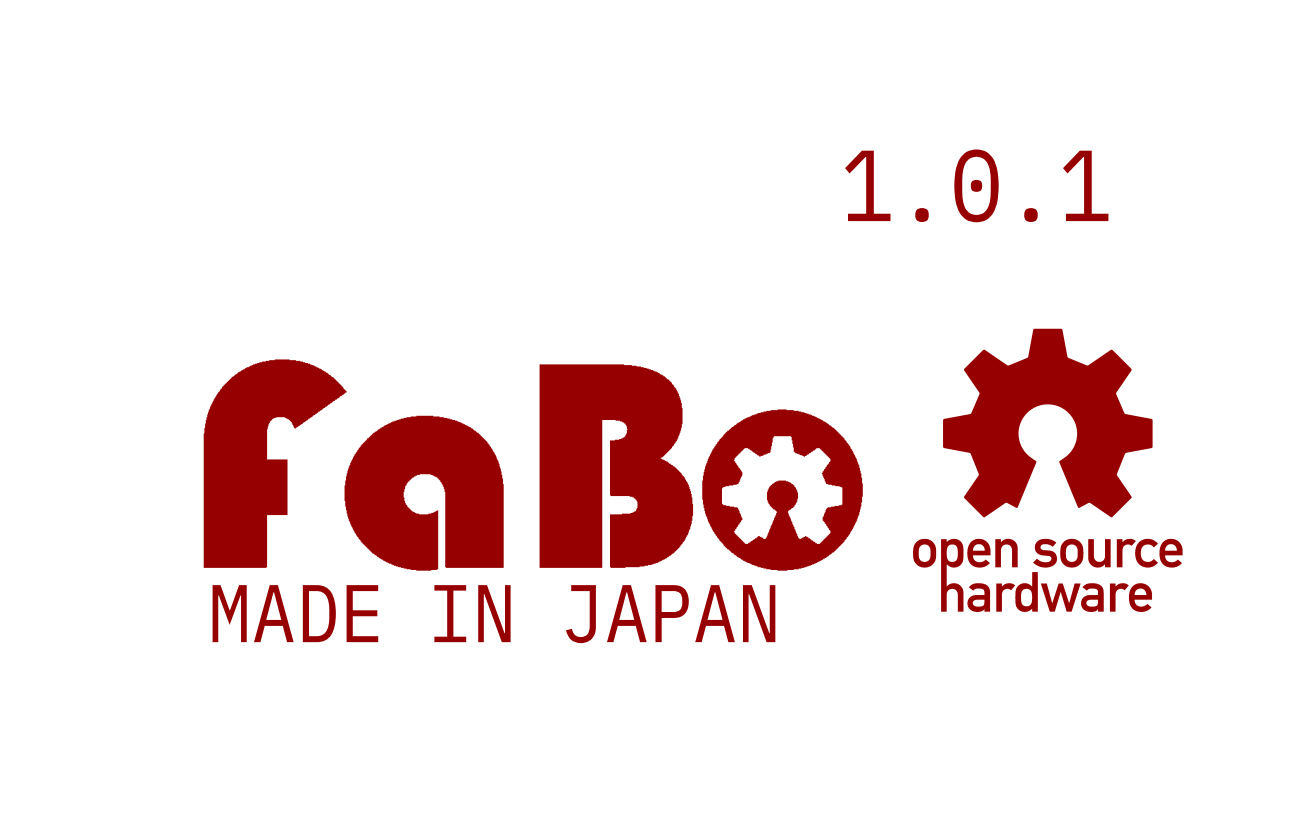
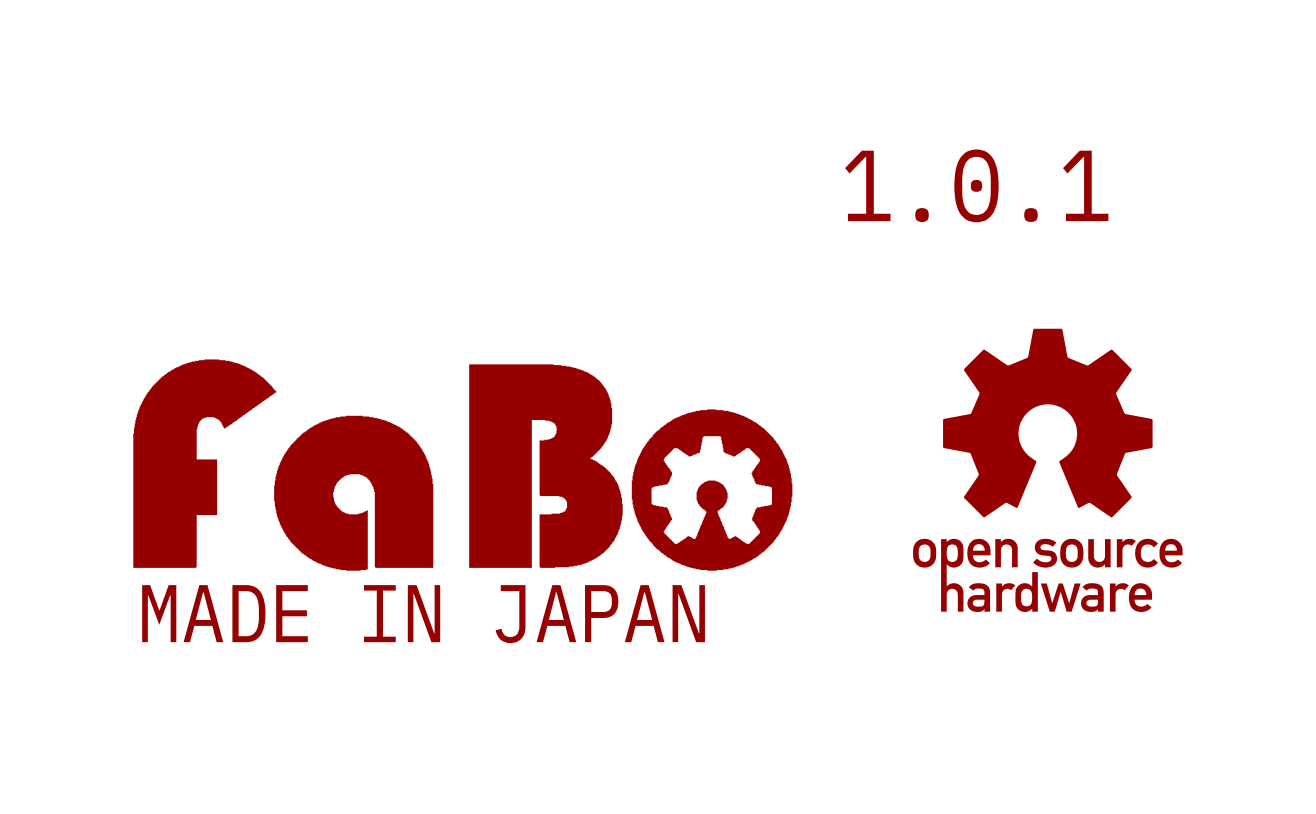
part position: (533, 465) -> (462, 465)

